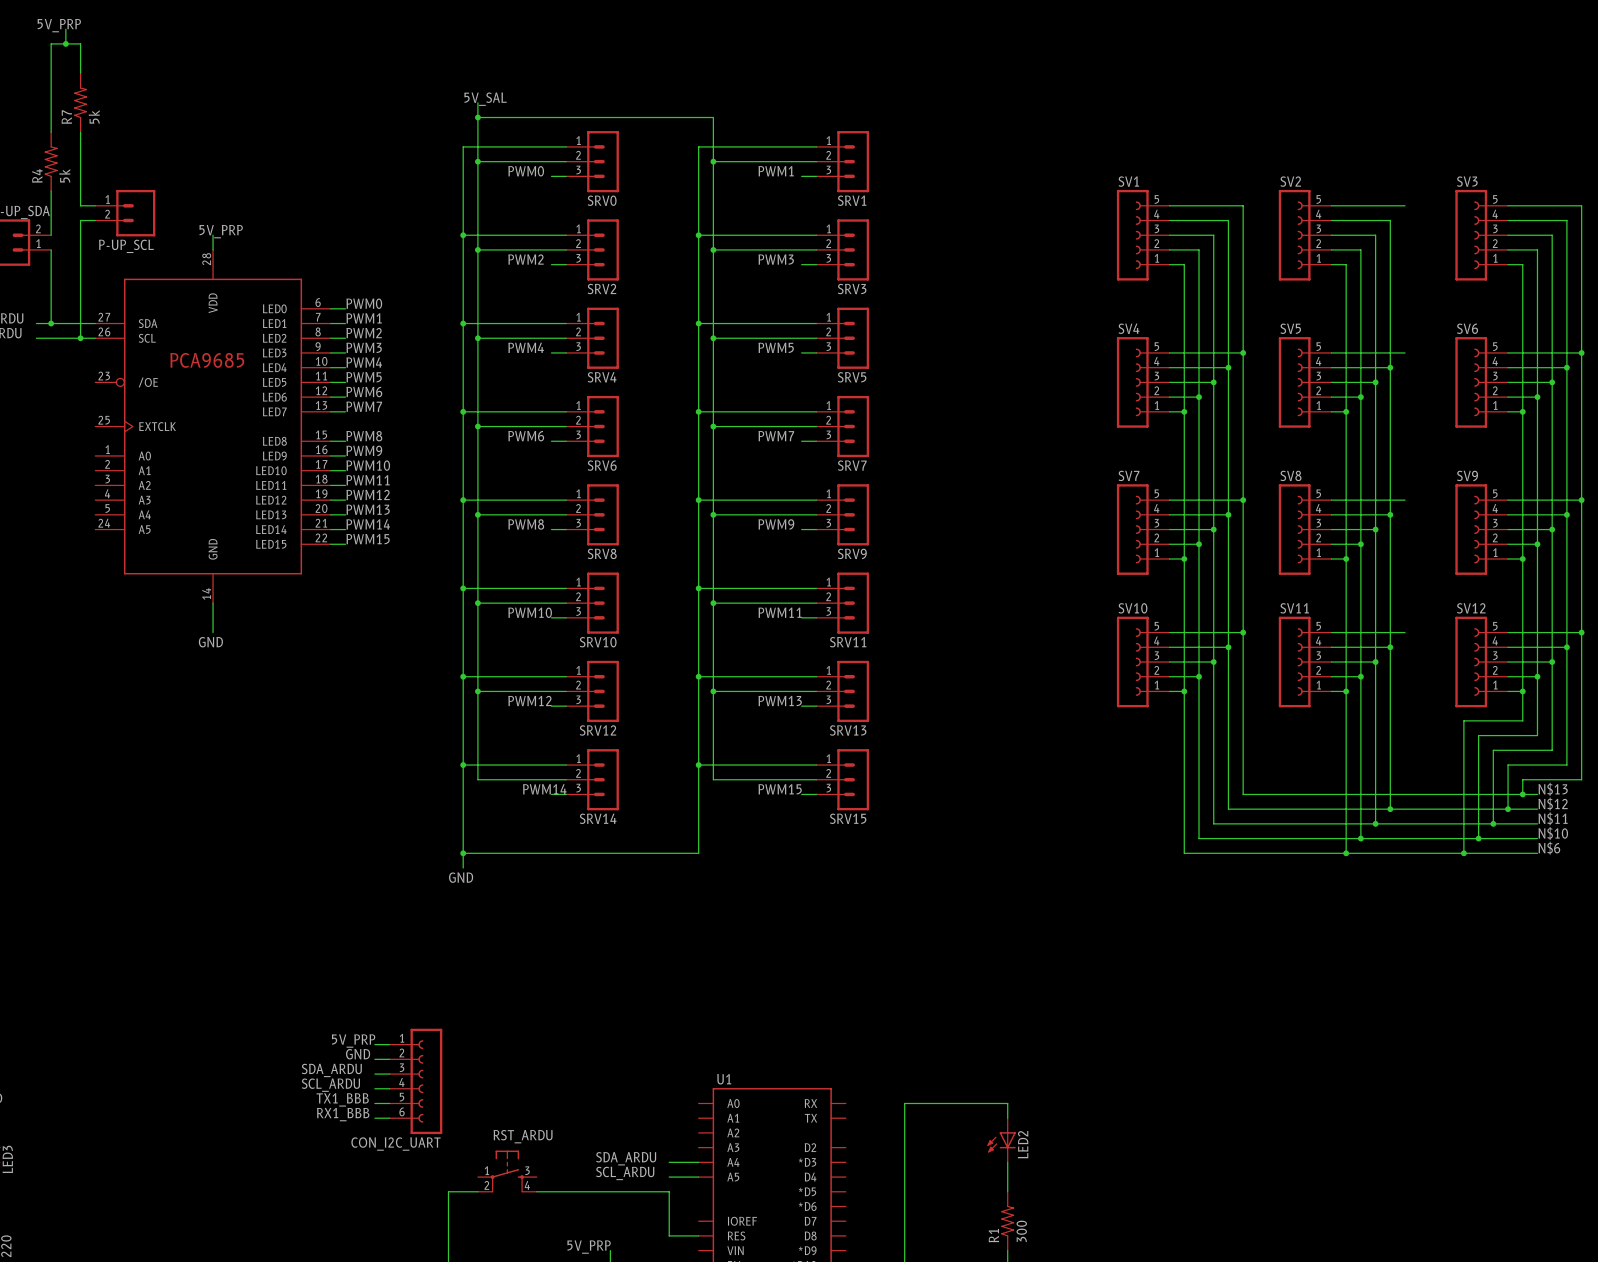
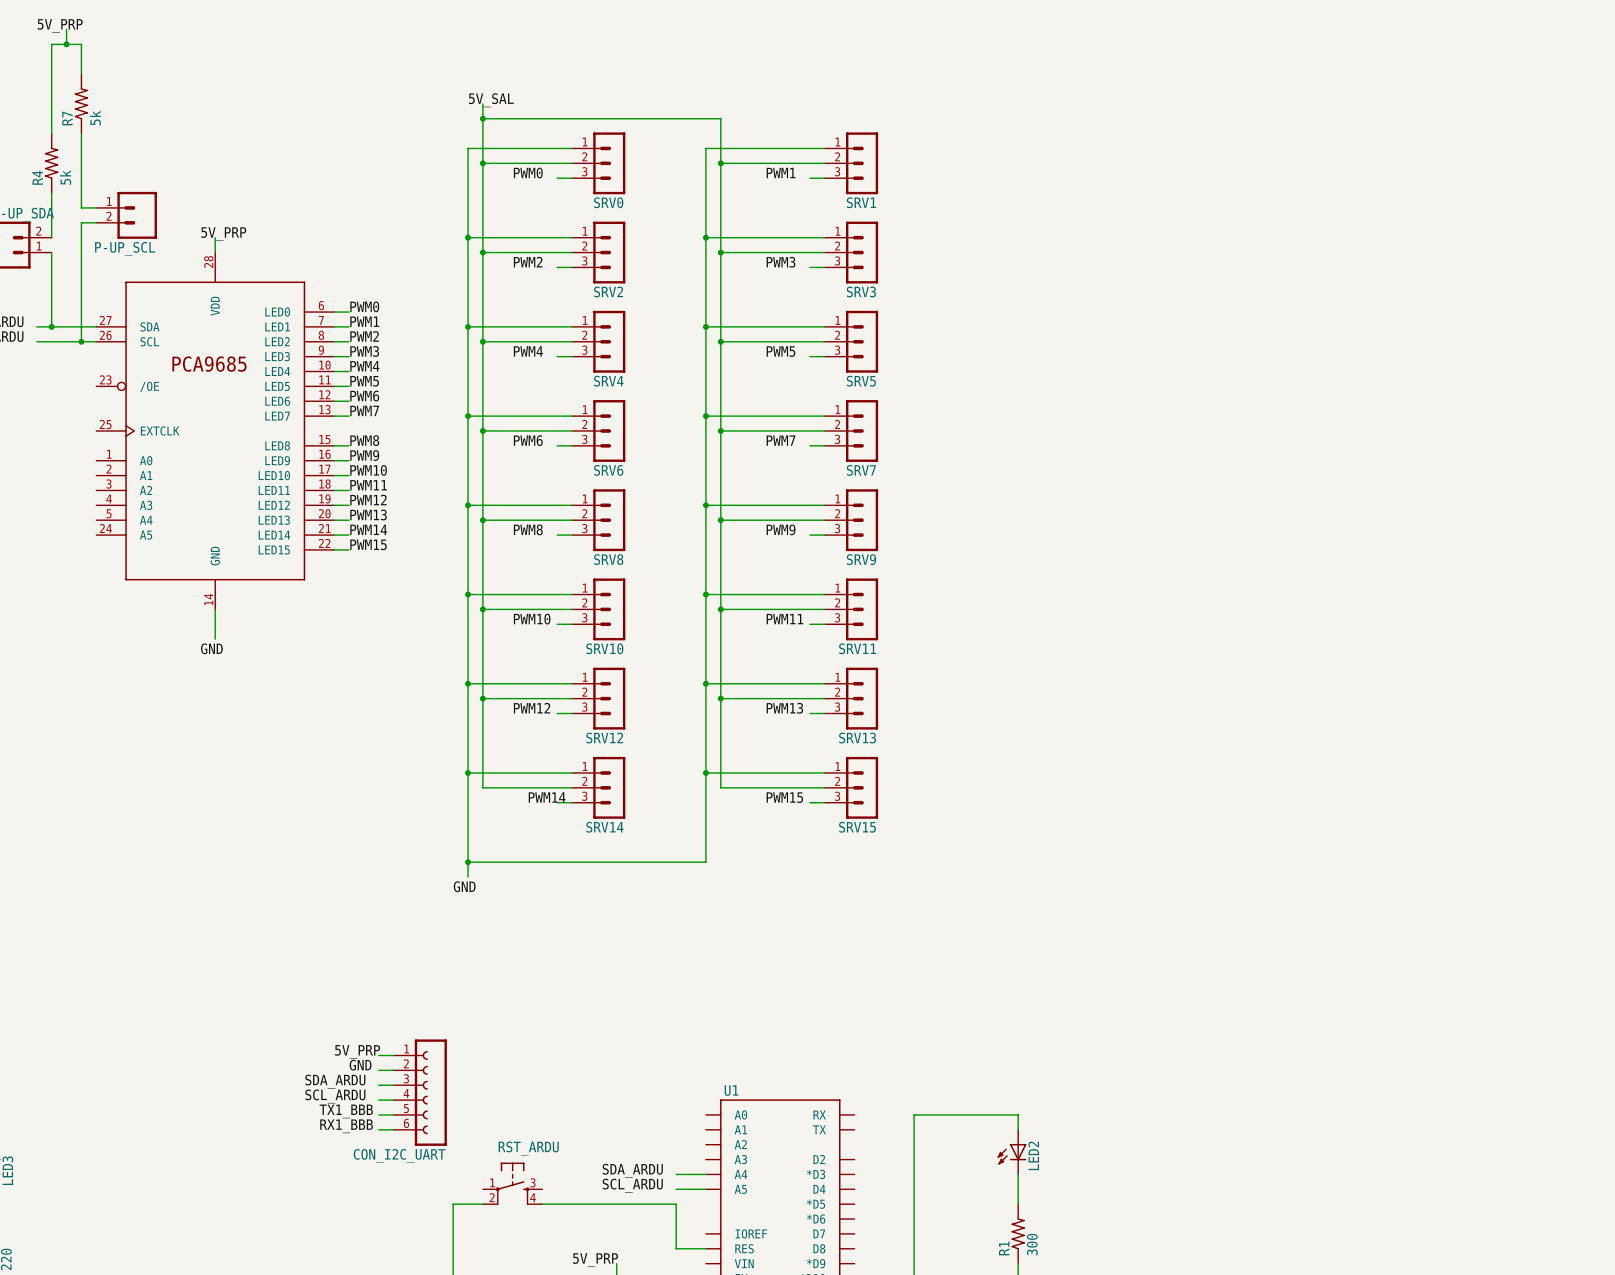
wire: (1169, 205) (1243, 205) (1243, 794) (1537, 794) -> none
wire: (1331, 205) (1405, 205) -> none
wire: (1508, 205) (1581, 205) (1581, 779) (1522, 779) (1522, 794) -> none
wire: (1169, 220) (1228, 220) (1228, 809) (1537, 809) -> none
wire: (1331, 220) (1390, 220) (1390, 809) -> none
wire: (1508, 220) (1566, 220) (1566, 765) (1508, 765) (1508, 809) -> none
SV1: (1143, 235) -> none
wire: (1169, 235) (1213, 235) (1213, 823) (1537, 823) -> none
SV2: (1305, 235) -> none
wire: (1331, 235) (1375, 235) (1375, 823) -> none
SV3: (1481, 235) -> none
wire: (1508, 235) (1552, 235) (1552, 750) (1493, 750) (1493, 823) -> none
wire: (1169, 249) (1199, 249) (1199, 838) (1537, 838) -> none
wire: (1331, 249) (1360, 249) (1360, 838) -> none
wire: (1508, 249) (1537, 249) (1537, 735) (1478, 735) (1478, 838) -> none
wire: (1169, 264) (1184, 264) (1184, 853) (1537, 853) -> none
wire: (1331, 264) (1346, 264) (1346, 853) -> none
wire: (1508, 264) (1522, 264) (1522, 720) (1463, 720) (1463, 853) -> none
wire: (1169, 352) (1243, 352) -> none
junction: (1243, 352) -> none
wire: (1331, 352) (1405, 352) -> none
wire: (1508, 352) (1581, 352) -> none
junction: (1581, 352) -> none
wire: (1169, 367) (1228, 367) -> none
junction: (1228, 367) -> none
wire: (1331, 367) (1390, 367) -> none
junction: (1390, 367) -> none
wire: (1508, 367) (1566, 367) -> none
junction: (1566, 367) -> none
SV4: (1143, 382) -> none
wire: (1169, 382) (1213, 382) -> none
junction: (1213, 382) -> none
SV5: (1305, 382) -> none
wire: (1331, 382) (1375, 382) -> none
junction: (1375, 382) -> none
SV6: (1481, 382) -> none
wire: (1508, 382) (1552, 382) -> none
junction: (1552, 382) -> none
wire: (1169, 397) (1199, 397) -> none
junction: (1199, 397) -> none
wire: (1331, 397) (1360, 397) -> none
junction: (1360, 397) -> none
wire: (1508, 397) (1537, 397) -> none
junction: (1537, 397) -> none
wire: (1169, 411) (1184, 411) -> none
junction: (1184, 411) -> none
wire: (1331, 411) (1346, 411) -> none
junction: (1346, 411) -> none
wire: (1508, 411) (1522, 411) -> none
junction: (1522, 411) -> none
wire: (1169, 500) (1243, 500) -> none
junction: (1243, 500) -> none
wire: (1331, 500) (1405, 500) -> none
wire: (1508, 500) (1581, 500) -> none
junction: (1581, 500) -> none
wire: (1169, 514) (1228, 514) -> none
junction: (1228, 514) -> none
wire: (1331, 514) (1390, 514) -> none
junction: (1390, 514) -> none
wire: (1508, 514) (1566, 514) -> none
junction: (1566, 514) -> none
SV7: (1143, 529) -> none
wire: (1169, 529) (1213, 529) -> none
junction: (1213, 529) -> none
SV8: (1305, 529) -> none
wire: (1331, 529) (1375, 529) -> none
junction: (1375, 529) -> none
SV9: (1481, 529) -> none
wire: (1508, 529) (1552, 529) -> none
junction: (1552, 529) -> none
wire: (1169, 544) (1199, 544) -> none
junction: (1199, 544) -> none
wire: (1331, 544) (1360, 544) -> none
junction: (1360, 544) -> none
wire: (1508, 544) (1537, 544) -> none
junction: (1537, 544) -> none
wire: (1169, 558) (1184, 558) -> none
junction: (1184, 558) -> none
wire: (1331, 558) (1346, 558) -> none
junction: (1346, 558) -> none
wire: (1508, 558) (1522, 558) -> none
junction: (1522, 558) -> none
wire: (1169, 632) (1243, 632) -> none
junction: (1243, 632) -> none
wire: (1331, 632) (1405, 632) -> none
wire: (1508, 632) (1581, 632) -> none
junction: (1581, 632) -> none
wire: (1169, 647) (1228, 647) -> none
junction: (1228, 647) -> none
wire: (1331, 647) (1390, 647) -> none
junction: (1390, 647) -> none
wire: (1508, 647) (1566, 647) -> none
junction: (1566, 647) -> none
SV10: (1143, 662) -> none
wire: (1169, 662) (1213, 662) -> none
junction: (1213, 662) -> none
SV11: (1305, 662) -> none
wire: (1331, 662) (1375, 662) -> none
junction: (1375, 662) -> none
SV12: (1481, 662) -> none
wire: (1508, 662) (1552, 662) -> none
junction: (1552, 662) -> none
wire: (1169, 676) (1199, 676) -> none
junction: (1199, 676) -> none
wire: (1331, 676) (1360, 676) -> none
junction: (1360, 676) -> none
wire: (1508, 676) (1537, 676) -> none
junction: (1537, 676) -> none
wire: (1169, 691) (1184, 691) -> none
junction: (1184, 691) -> none
wire: (1331, 691) (1346, 691) -> none
junction: (1346, 691) -> none
wire: (1508, 691) (1522, 691) -> none
junction: (1522, 691) -> none
label: N$13 (1553, 789) -> none
junction: (1522, 794) -> none
label: N$12 (1553, 804) -> none
junction: (1390, 809) -> none
junction: (1508, 809) -> none
label: N$11 (1553, 818) -> none
junction: (1375, 823) -> none
junction: (1493, 823) -> none
label: N$10 (1553, 833) -> none
junction: (1360, 838) -> none
junction: (1478, 838) -> none
label: N$6 (1549, 848) -> none
junction: (1346, 853) -> none
junction: (1463, 853) -> none

